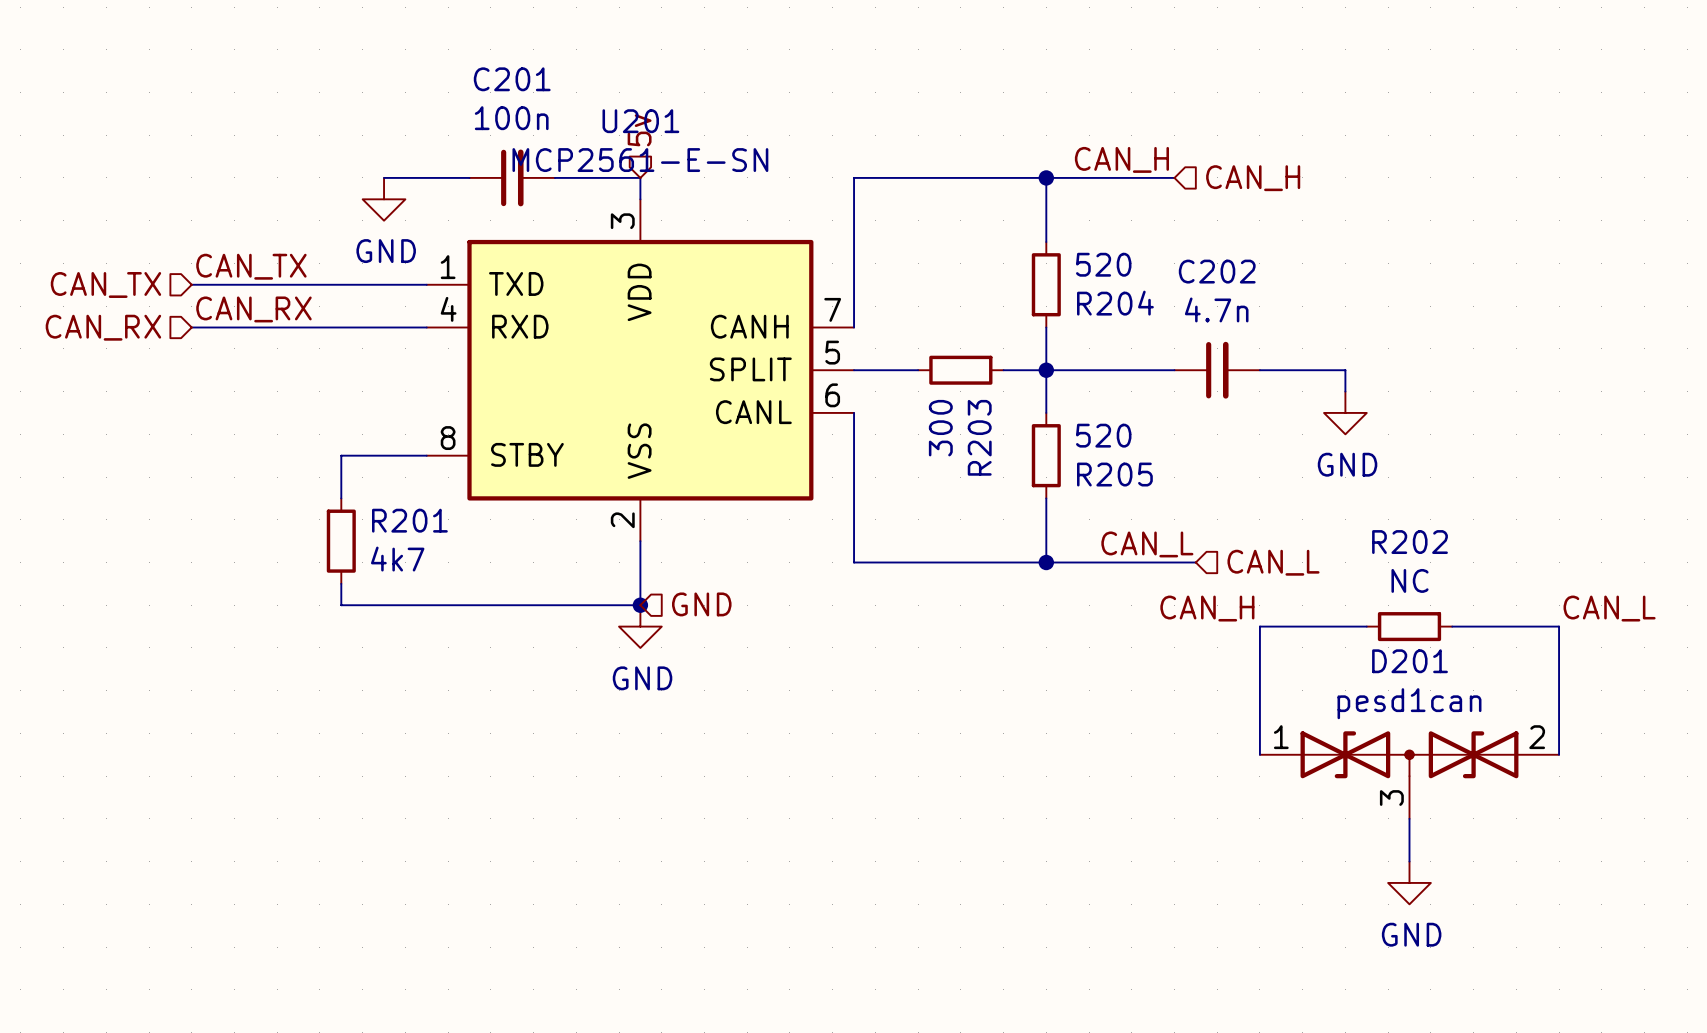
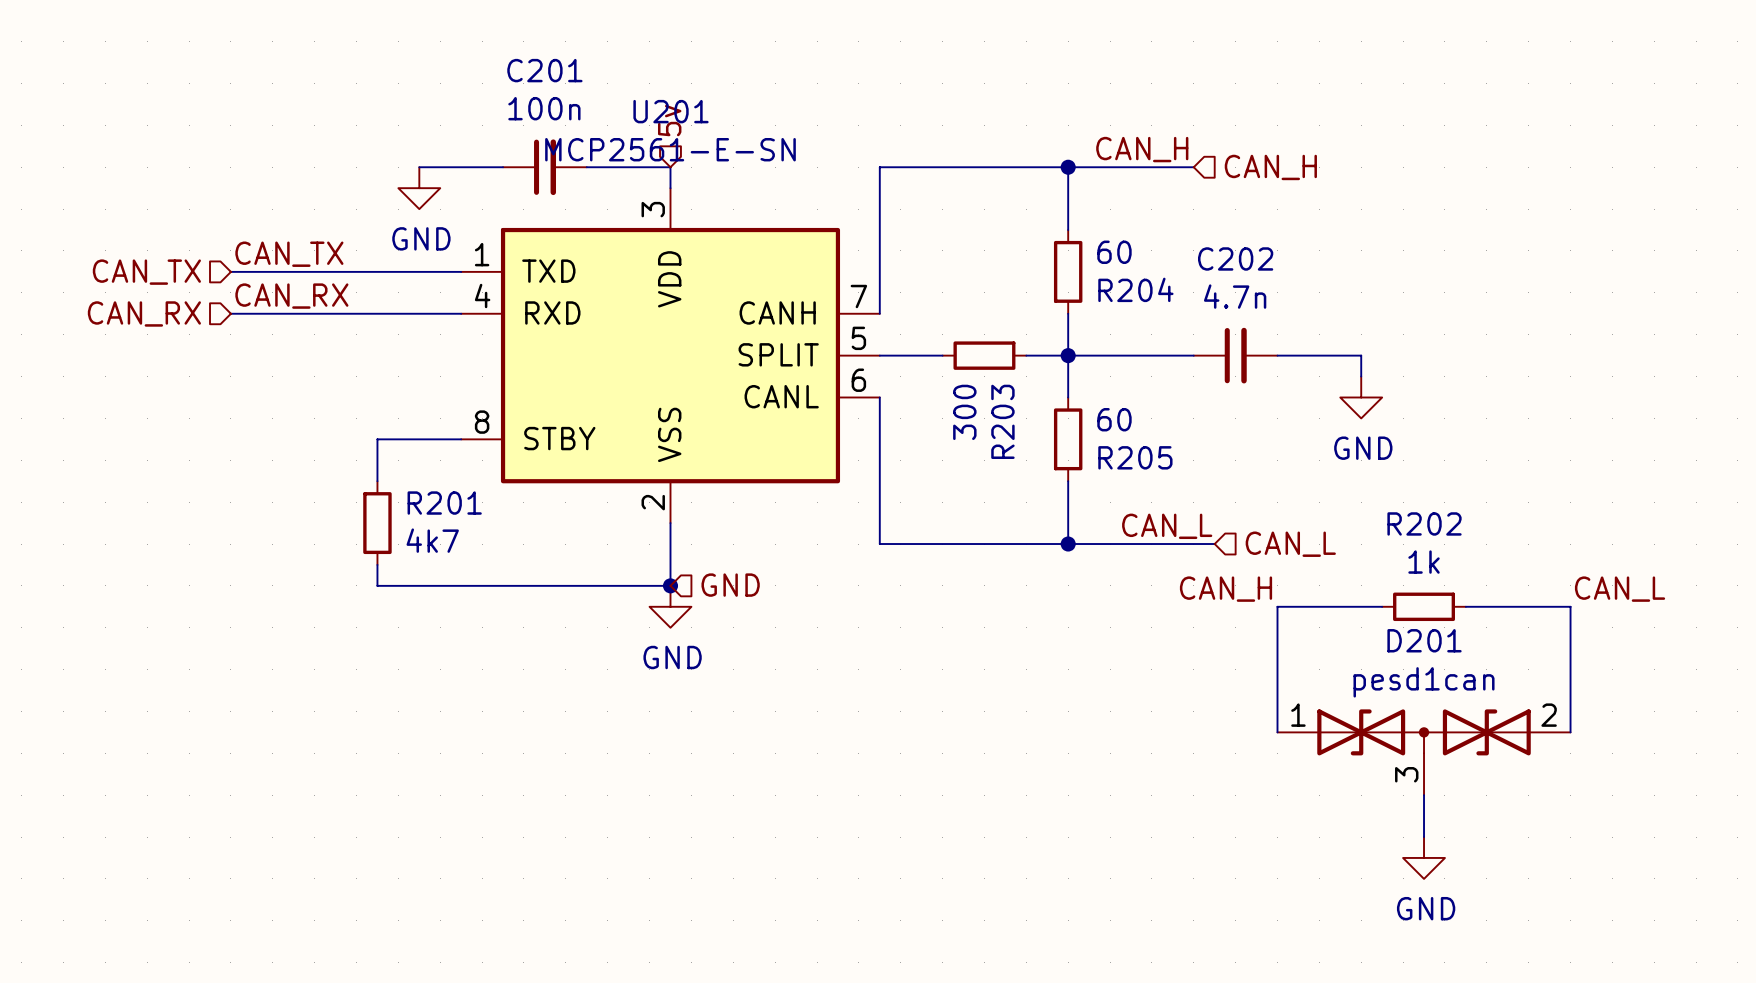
R204 value: 520 (1103, 264) -> 60 (1114, 252)
R205 value: 520 (1103, 435) -> 60 (1114, 419)
R202 value: NC (1410, 580) -> 1k (1424, 562)

